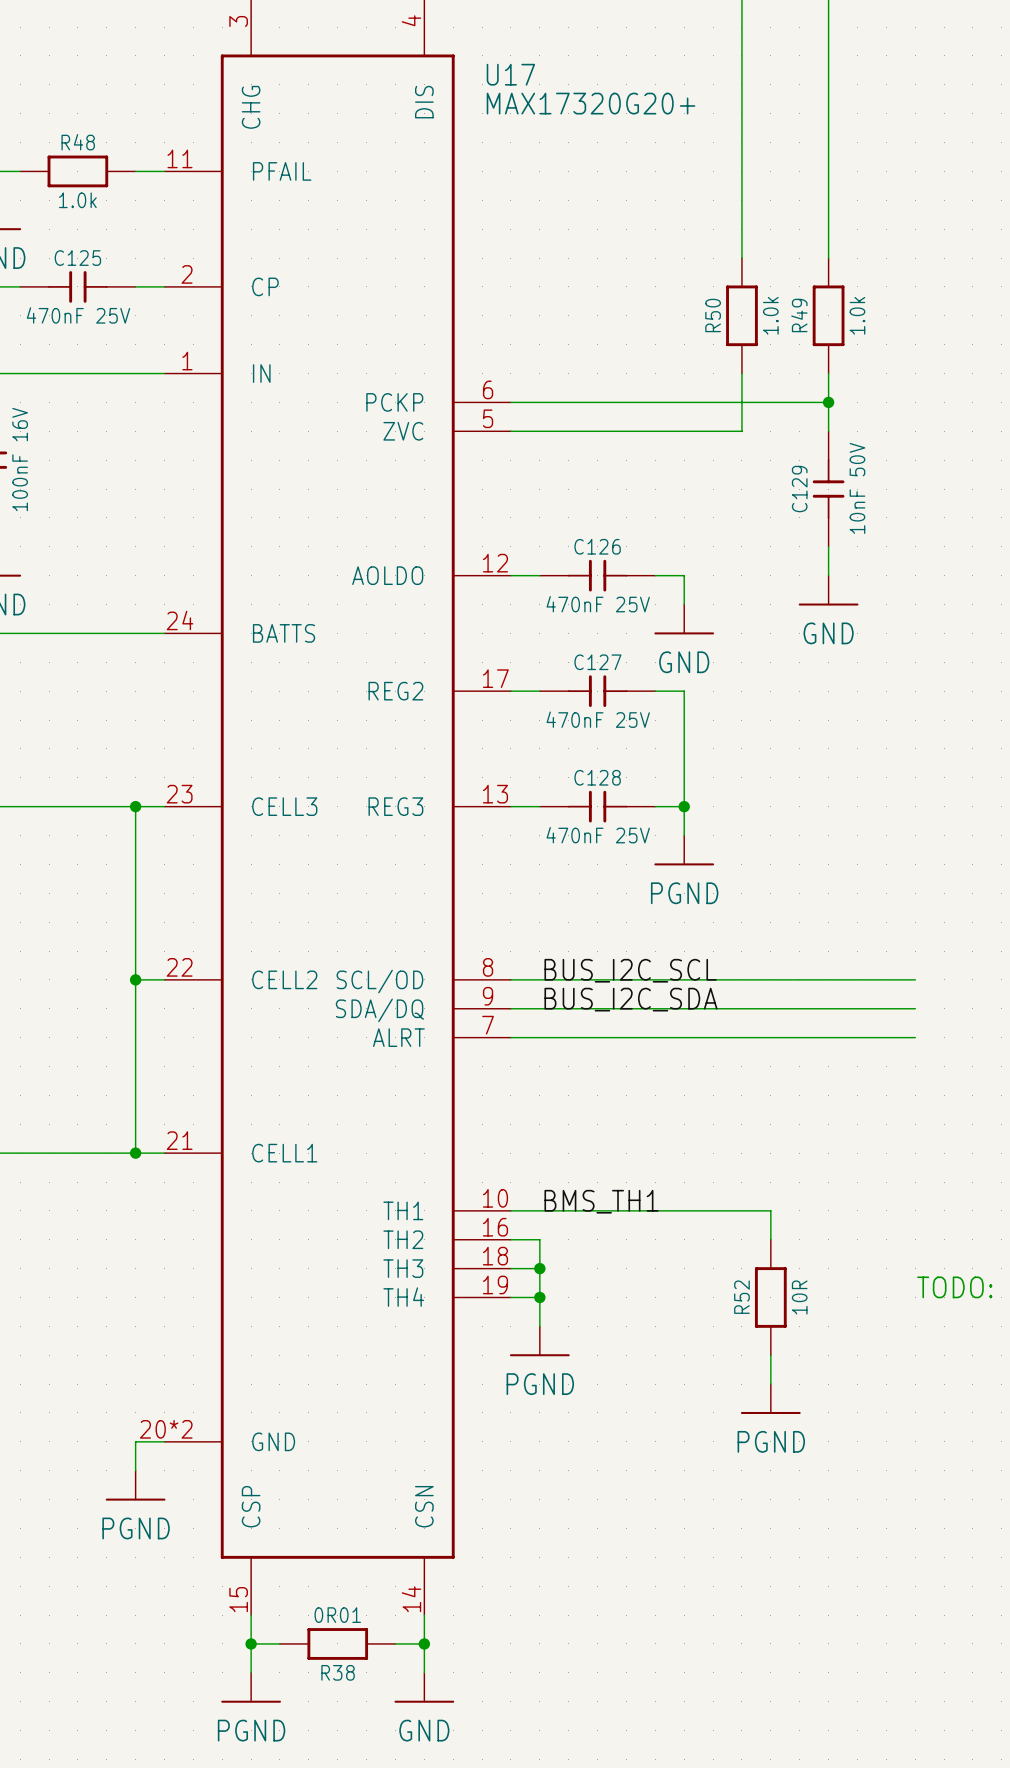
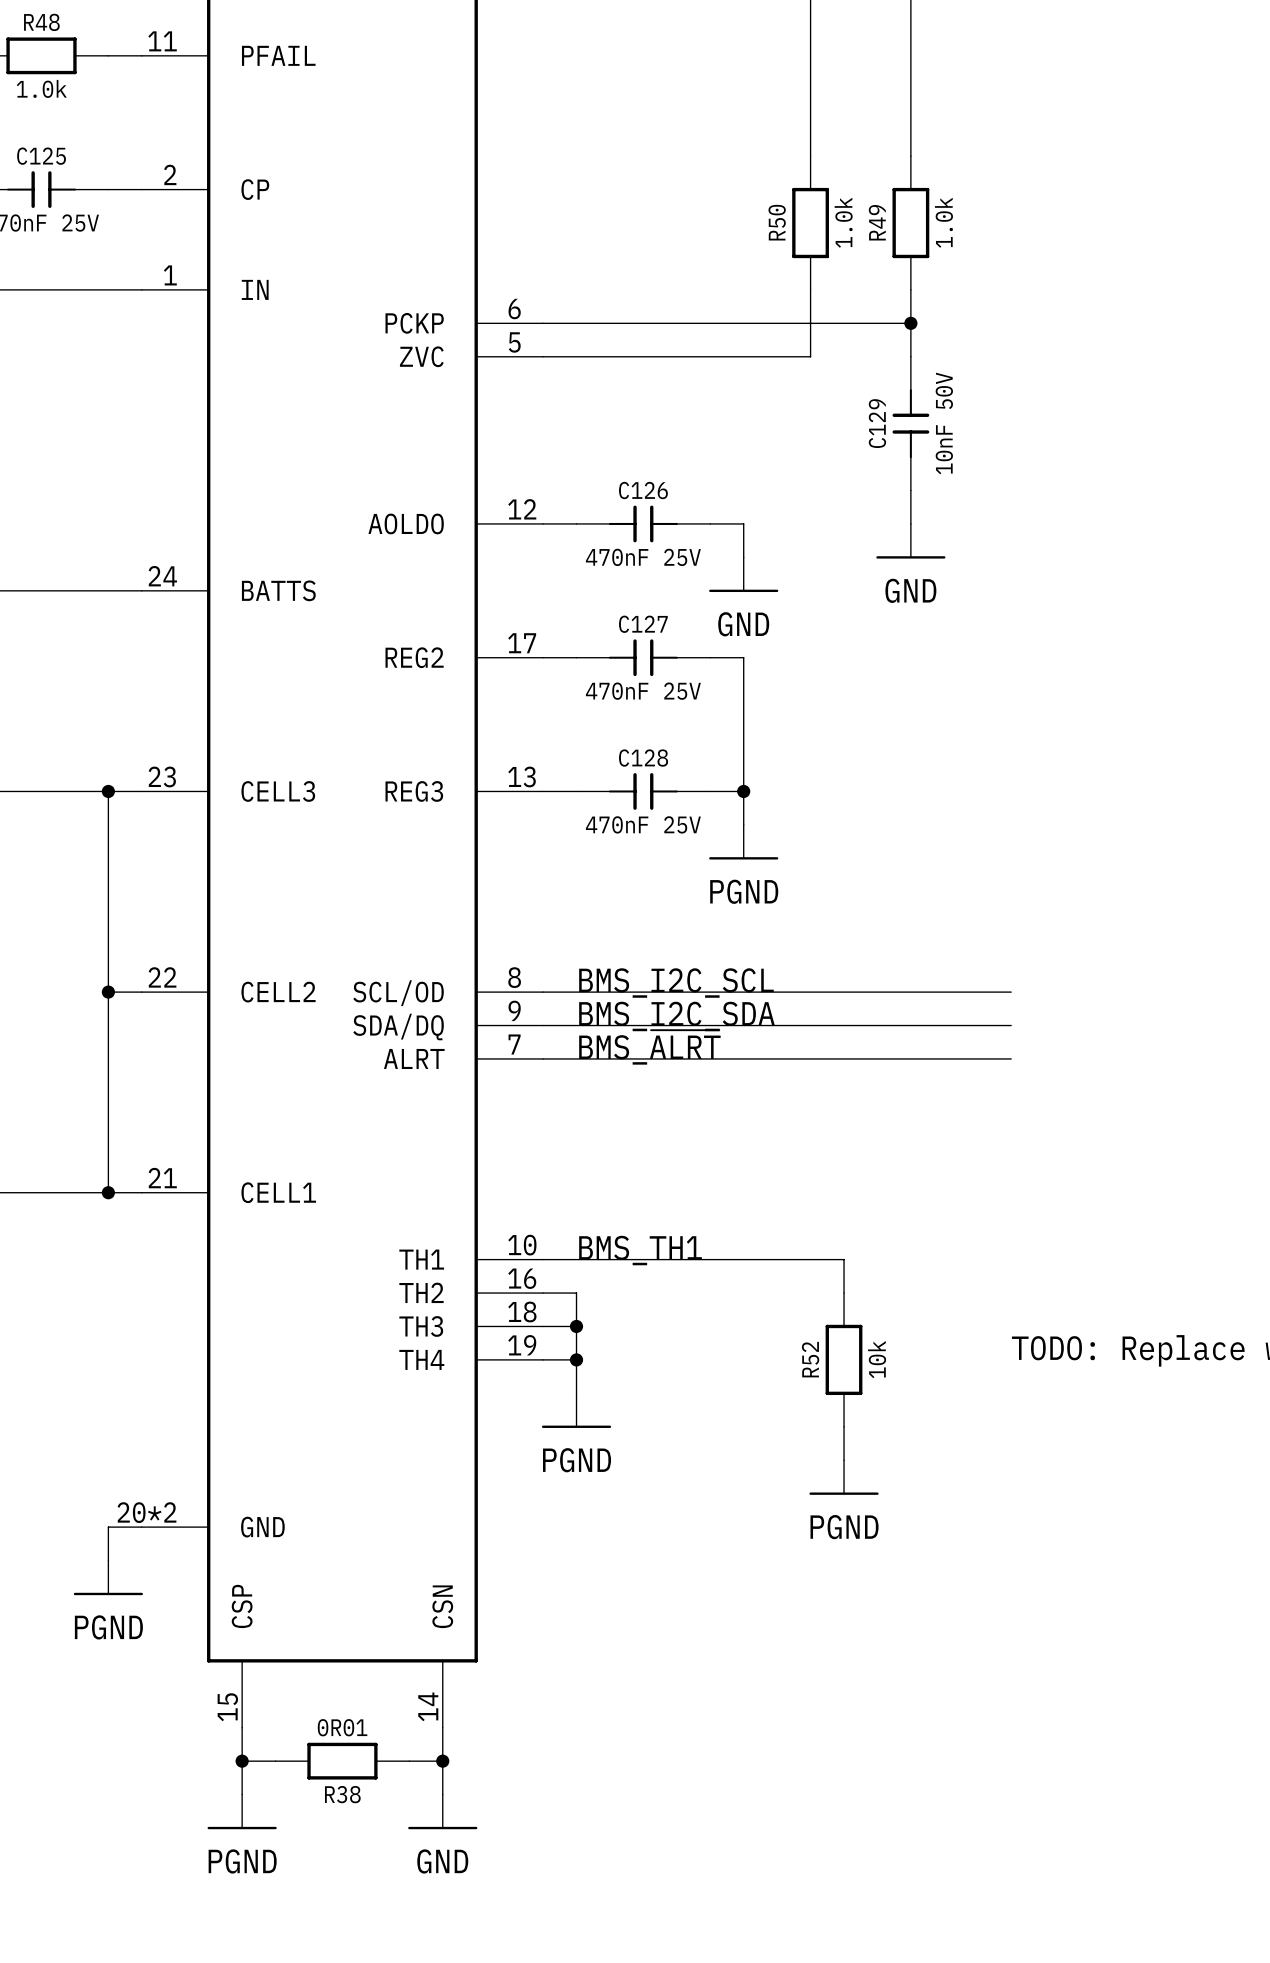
label: BUS_I2C_SCL (630, 970) -> BMS_I2C_SCL (676, 983)
label: BUS_I2C_SDA (631, 999) -> BMS_I2C_SDA (676, 1016)
label: none -> BMS_~{ALRT} (649, 1047)
R52 value: 10R (799, 1297) -> 10k (877, 1359)

